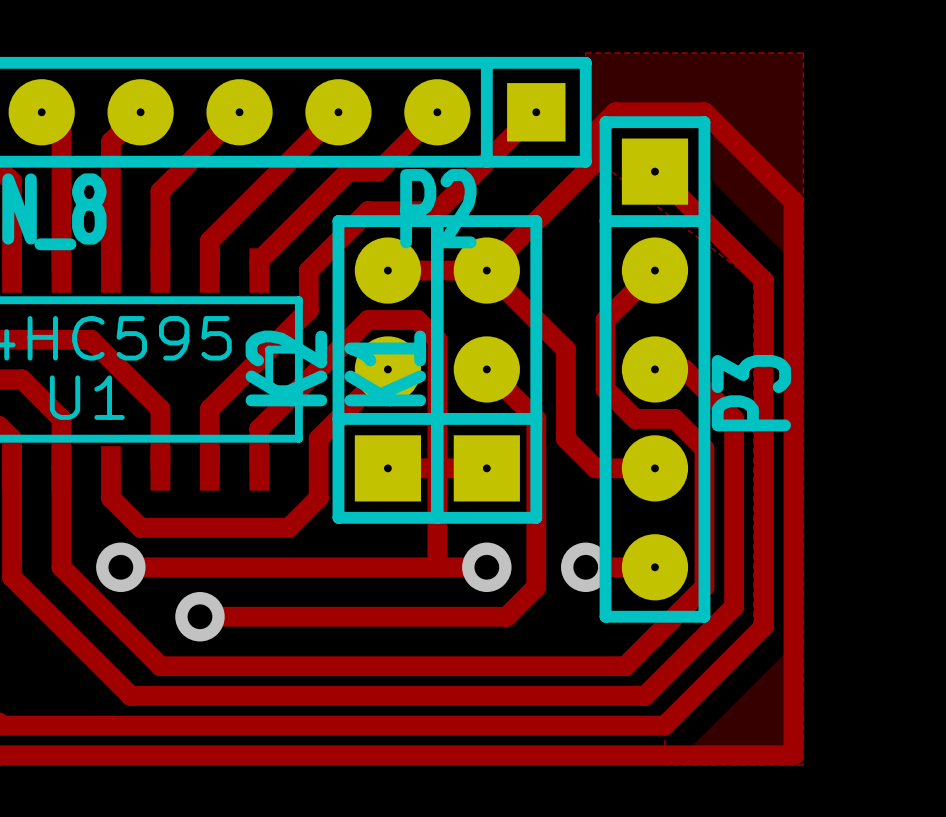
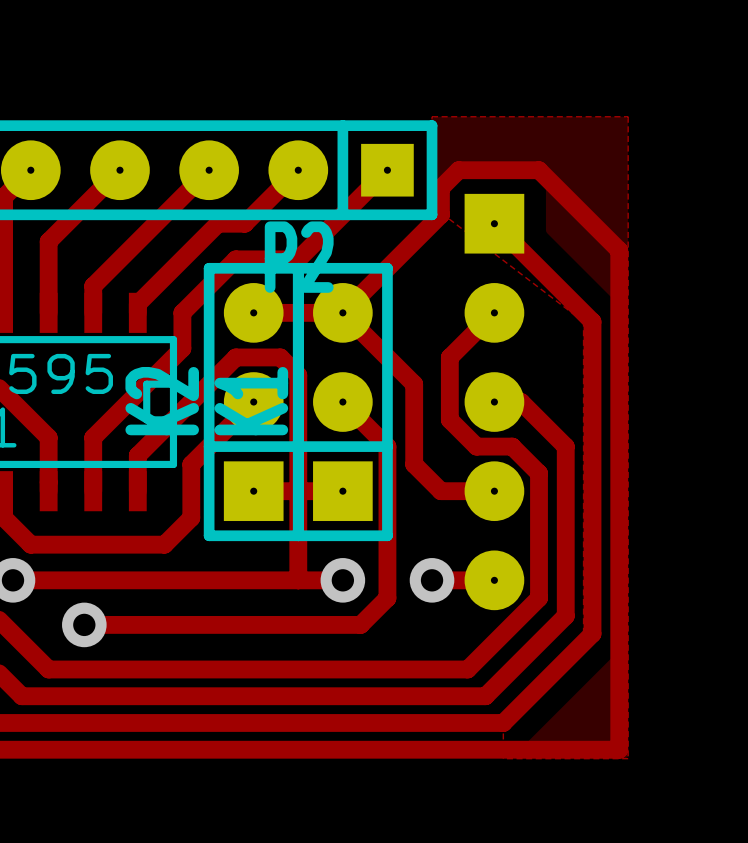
P3 side: top (654, 369) -> bottom (494, 402)

